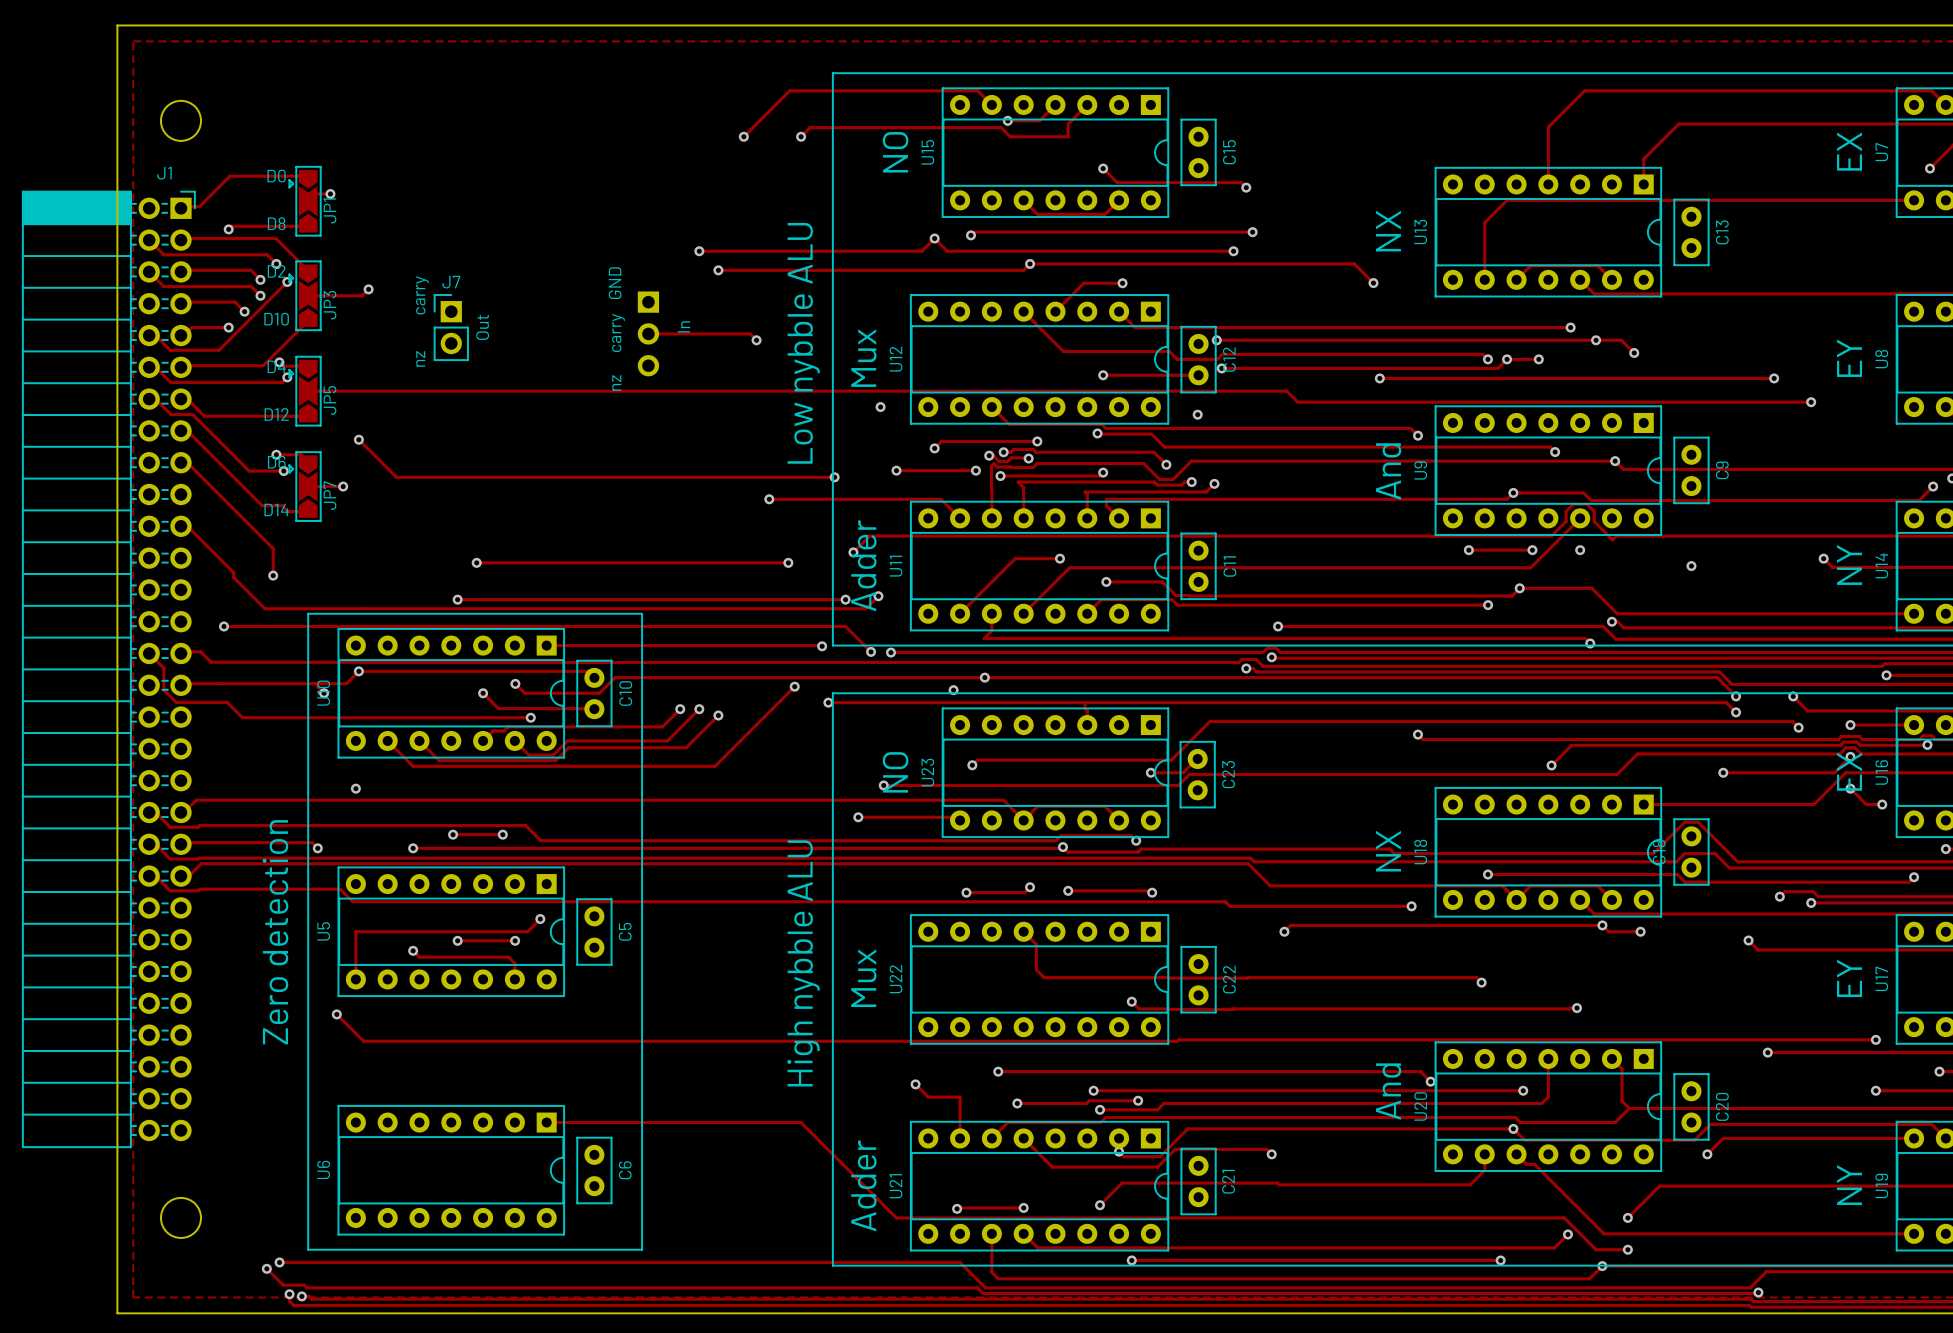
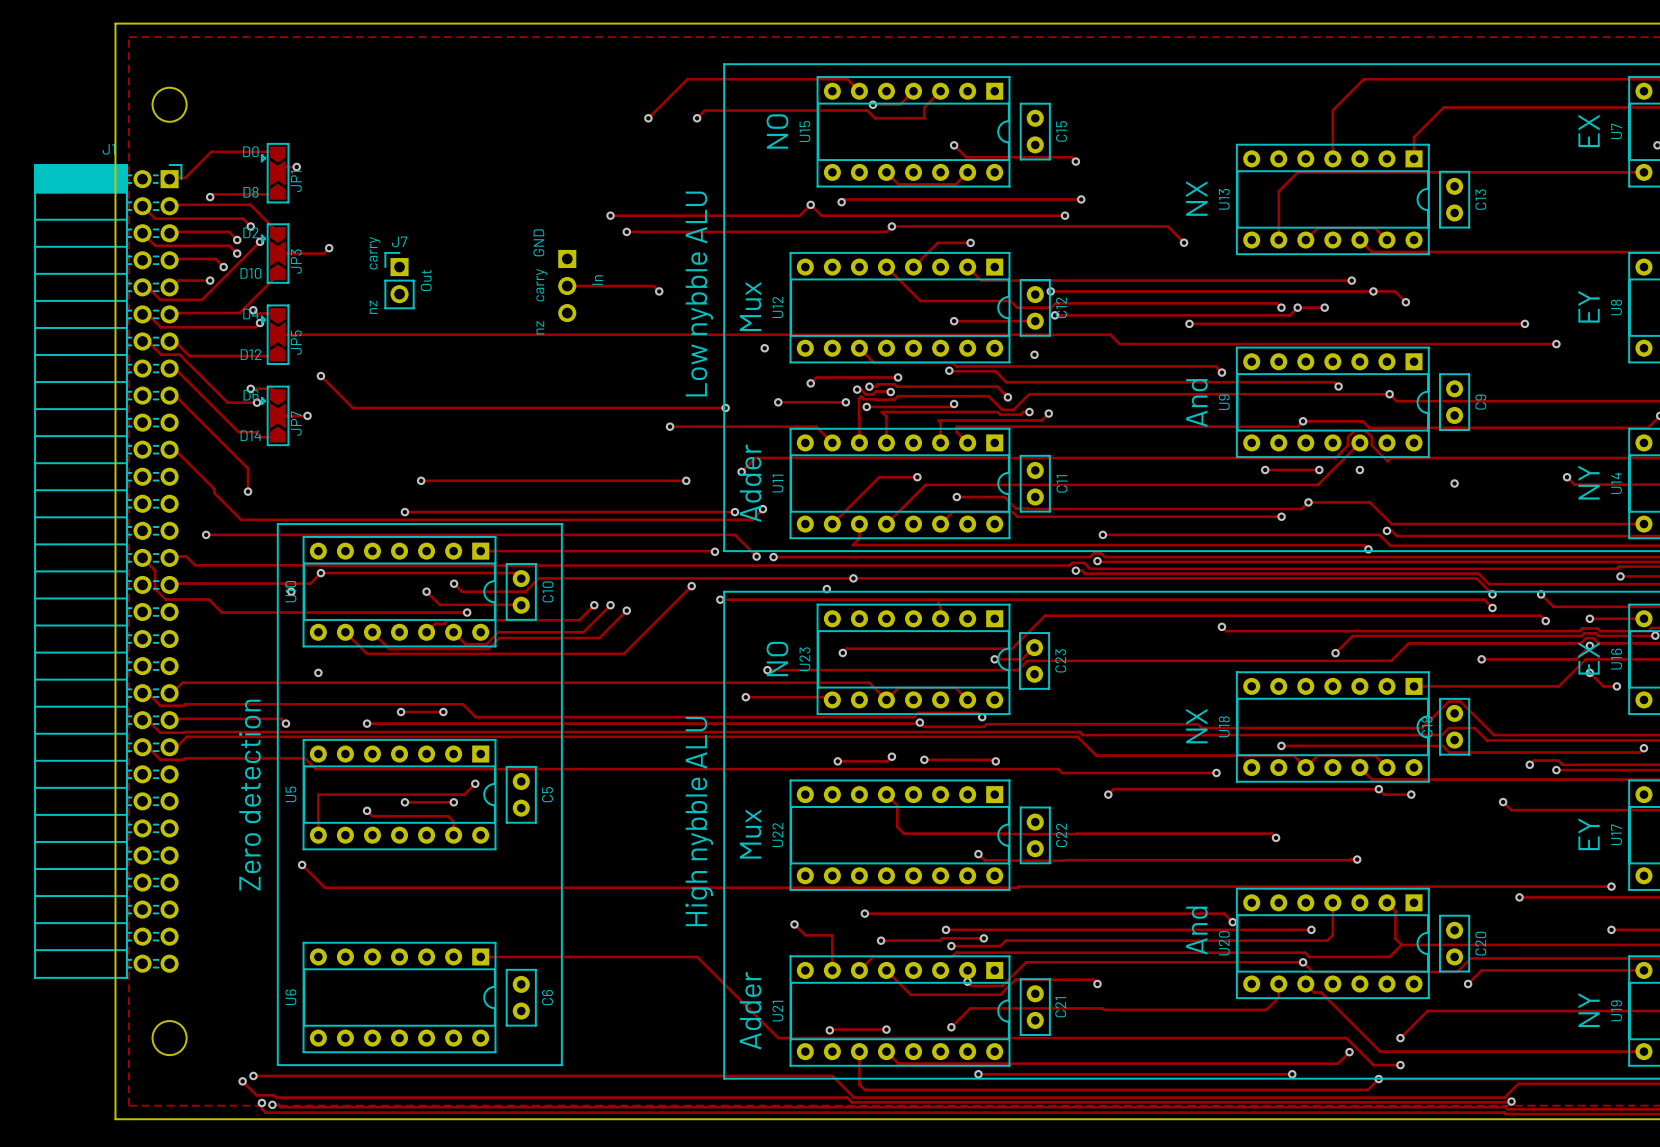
J1 name position: J1 (164, 173) -> J1 (108, 149)

